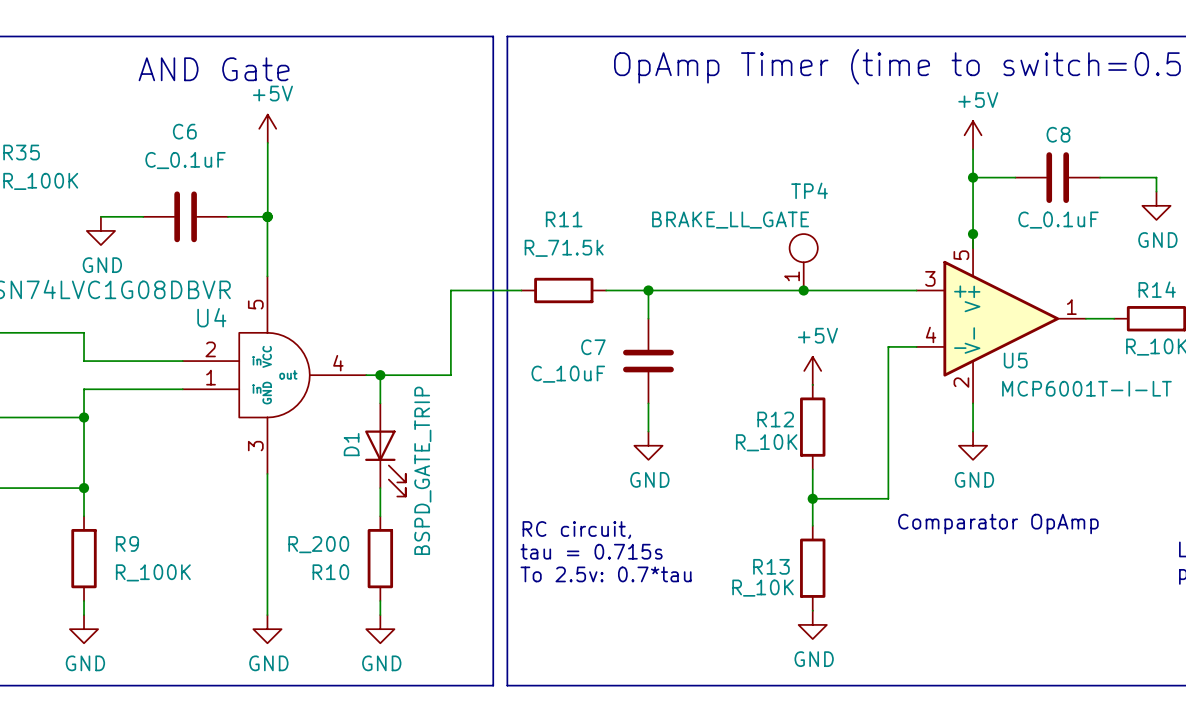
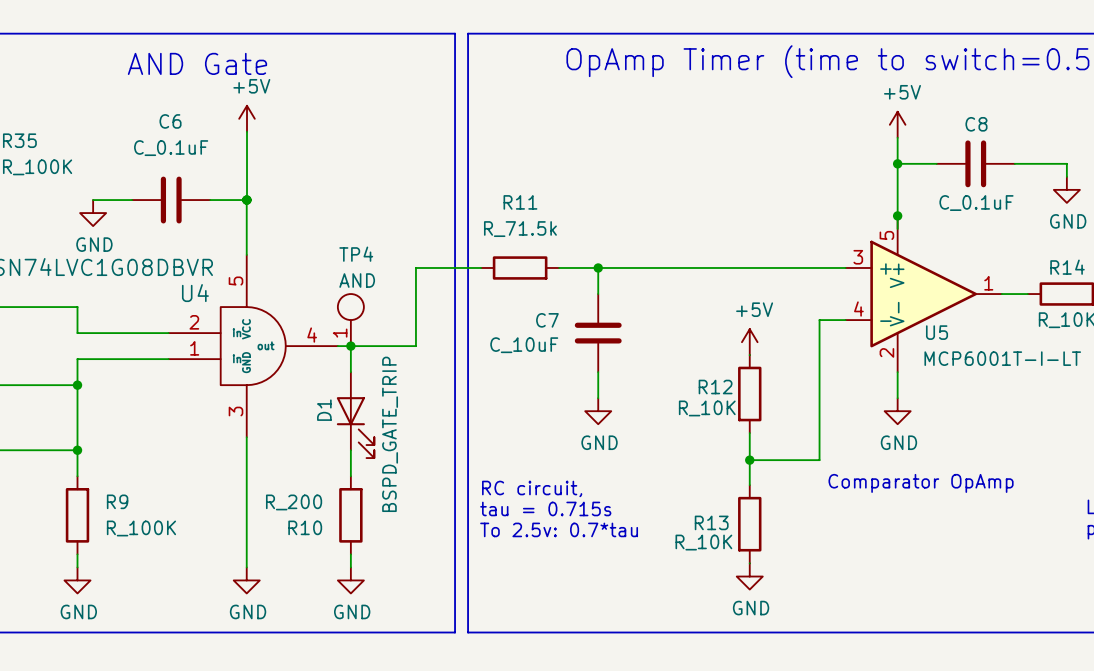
TP4 value: BRAKE_LL_GATE (730, 220) -> AND (357, 280)
TP4 position: (803, 262) -> (350, 320)
junction: (803, 290) -> none

